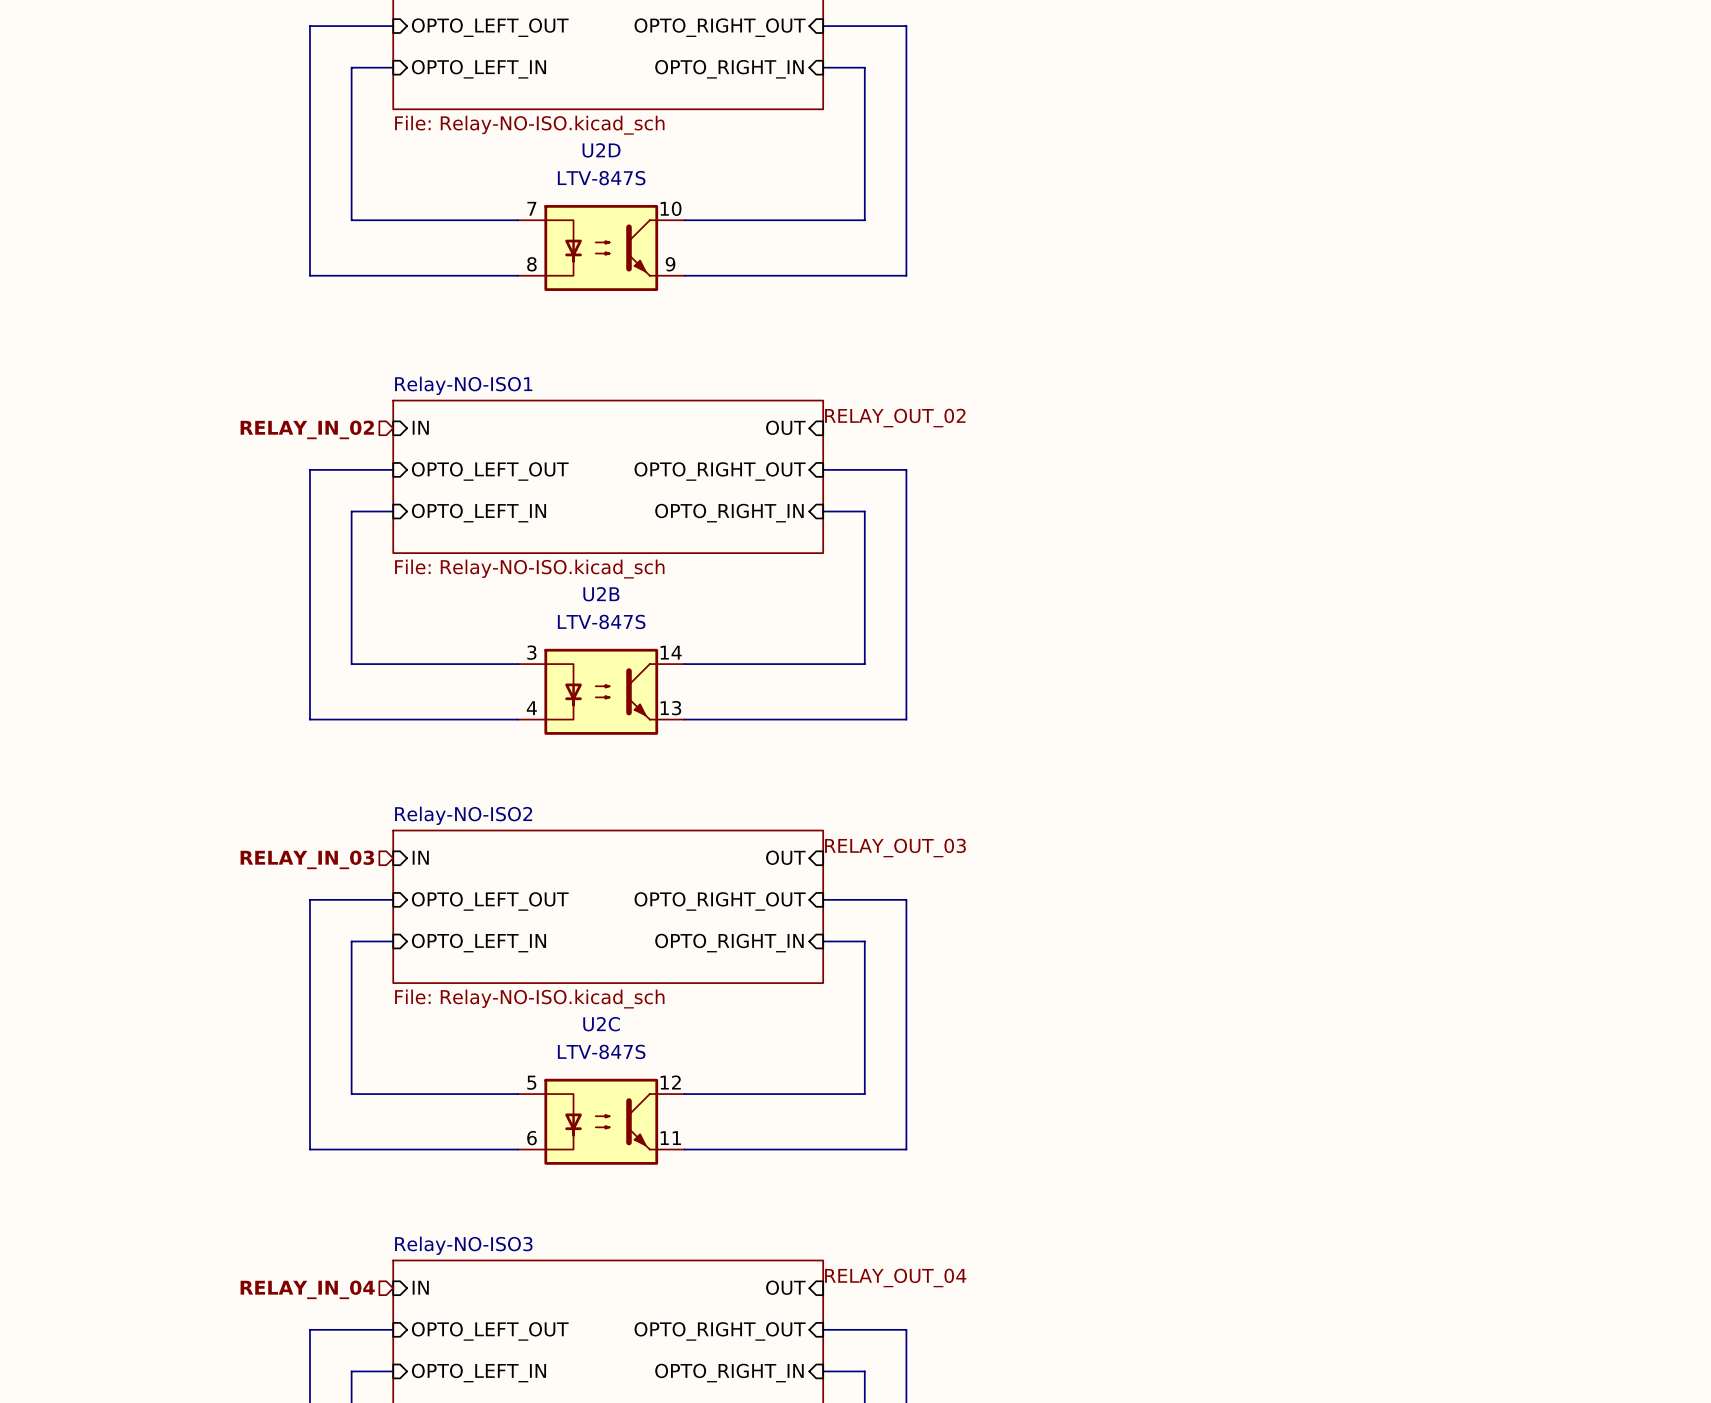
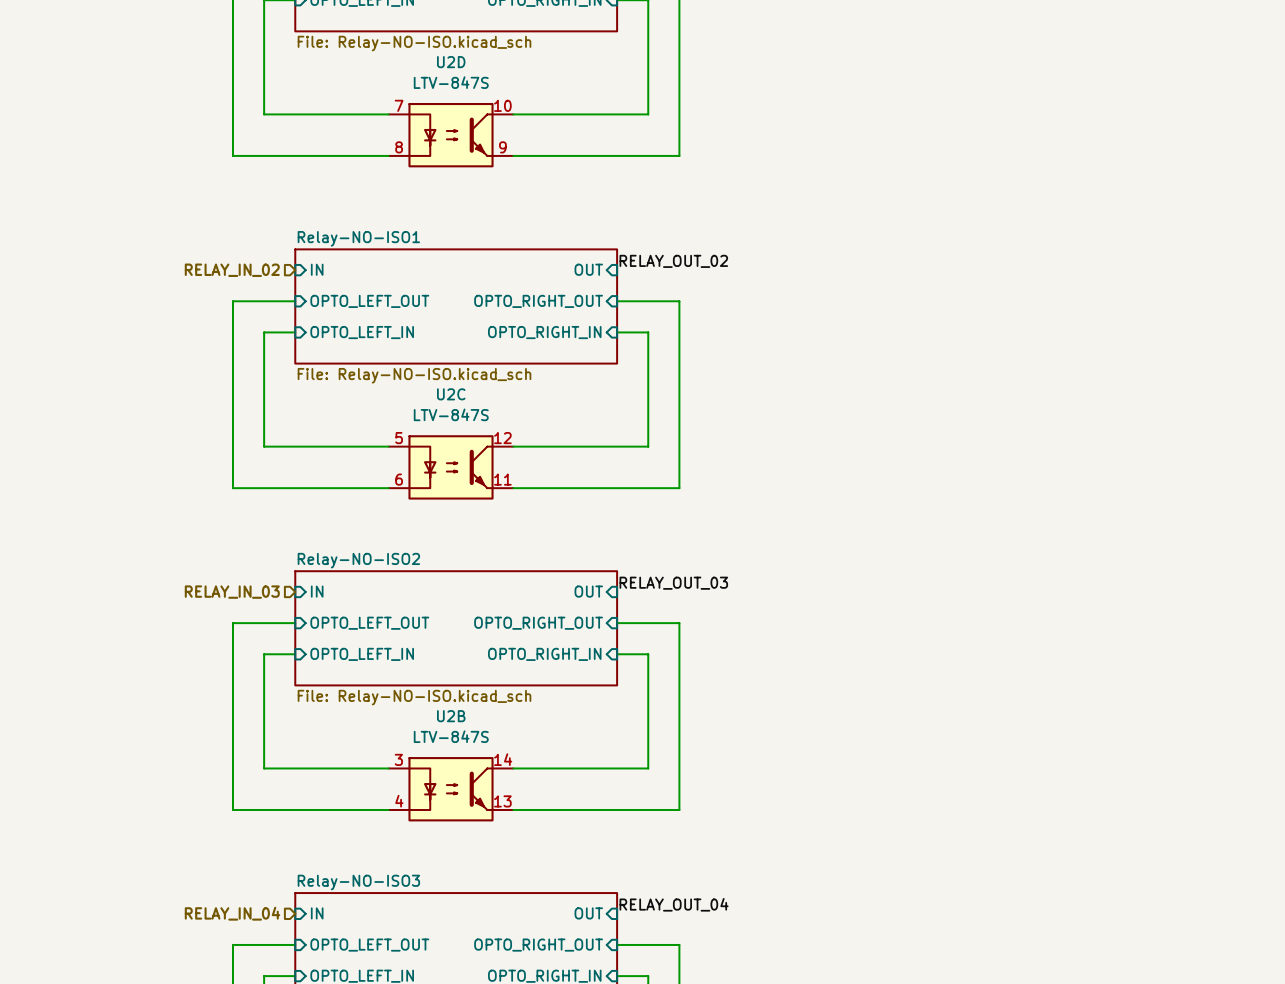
U2B position: (601, 691) -> (451, 789)
U2C position: (601, 1121) -> (451, 467)

